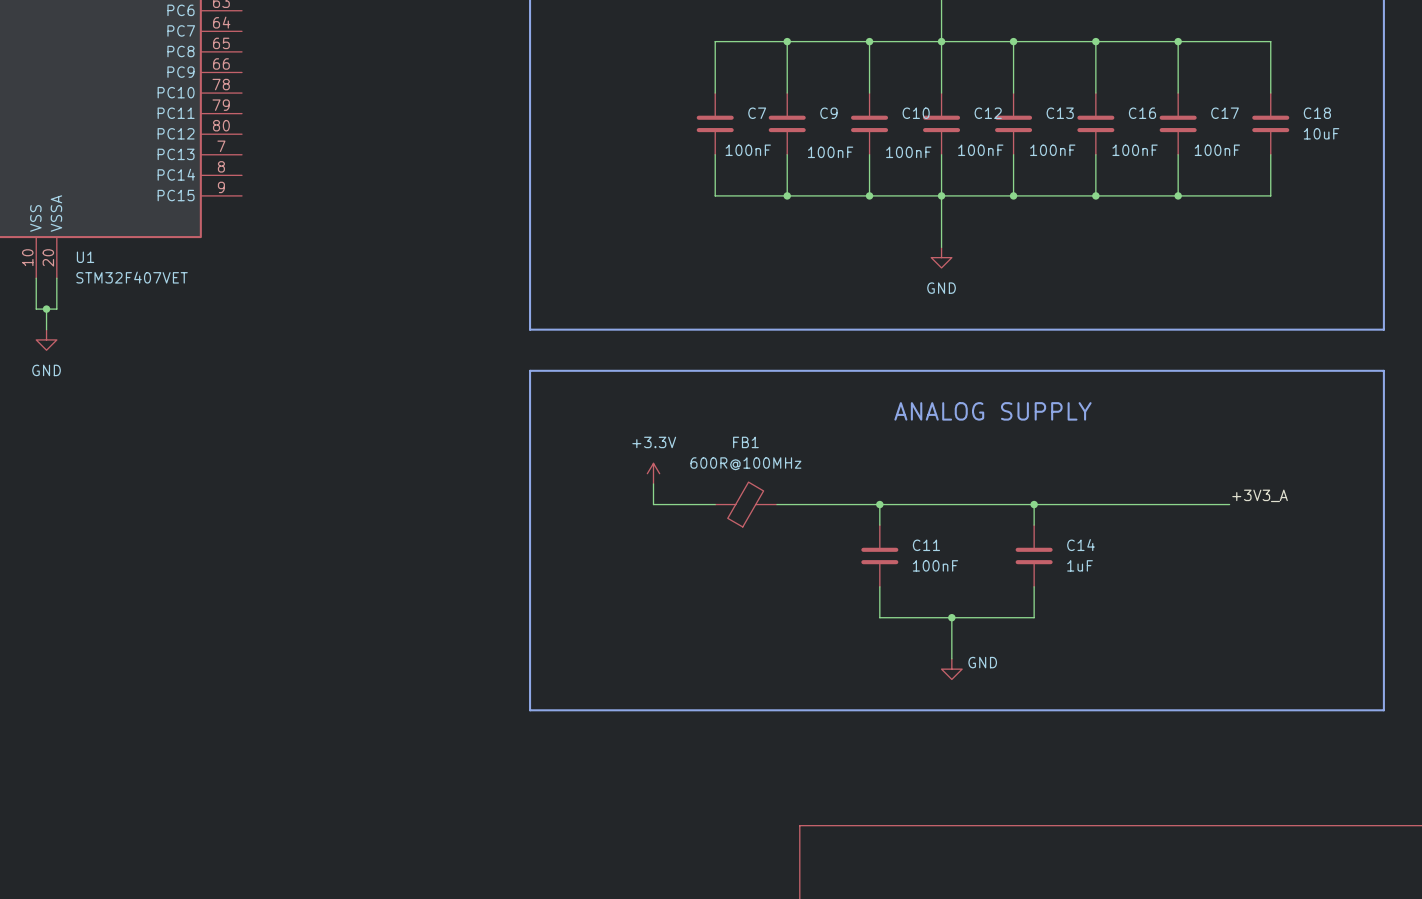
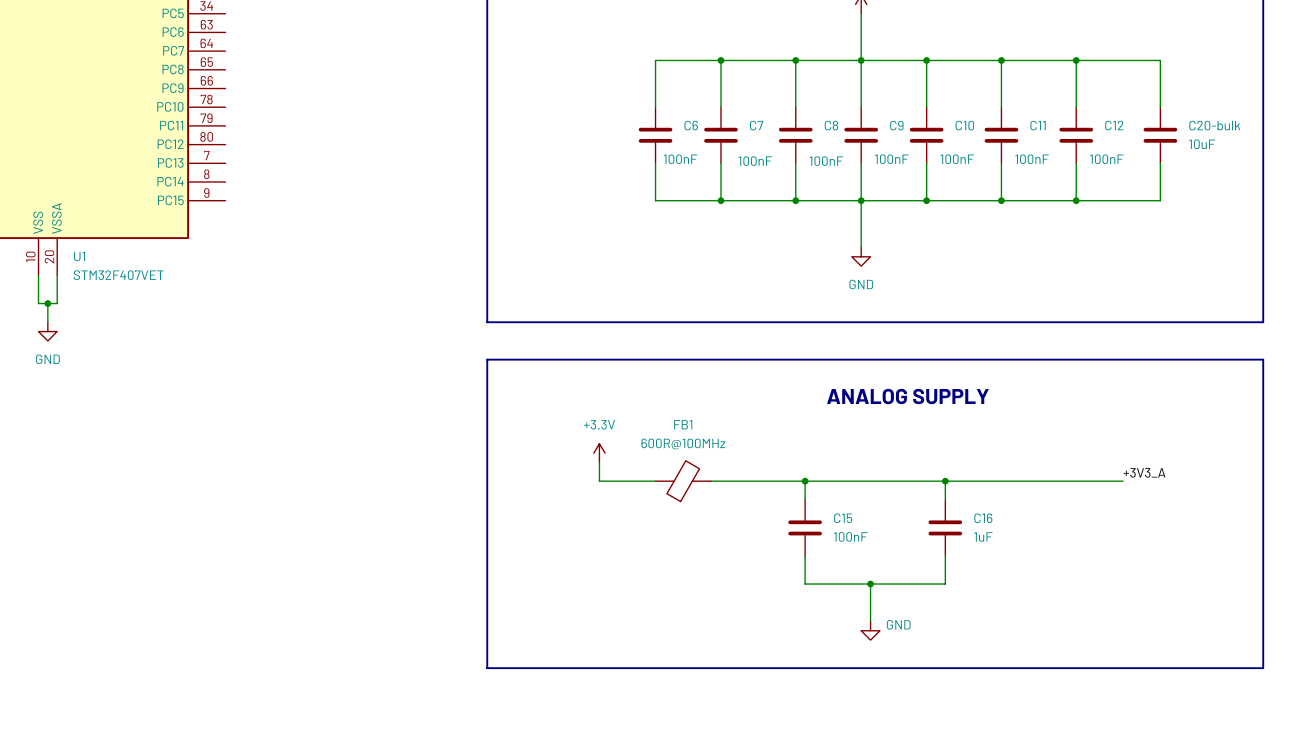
C7 name: C7 (757, 113) -> C6 (691, 125)
C9 name: C9 (828, 113) -> C7 (756, 125)
C10 name: C10 (916, 113) -> C8 (831, 125)
C12 name: C12 (988, 113) -> C9 (896, 125)
C13 name: C13 (1060, 113) -> C10 (964, 125)
C16 name: C16 (1142, 113) -> C11 (1038, 125)
C17 name: C17 (1225, 113) -> C12 (1114, 125)
C18 name: C18 (1317, 113) -> C20-bulk (1214, 125)
C11 name: C11 (926, 545) -> C15 (843, 518)
C14 name: C14 (1081, 545) -> C16 (983, 518)

